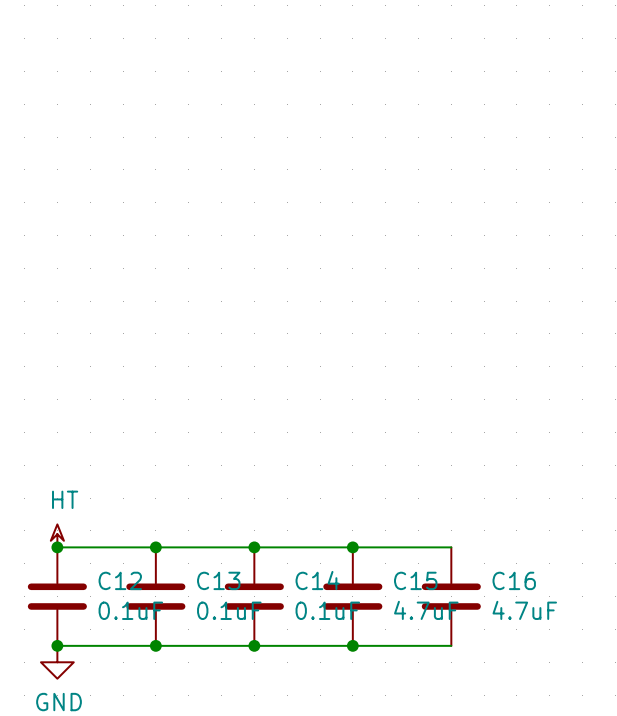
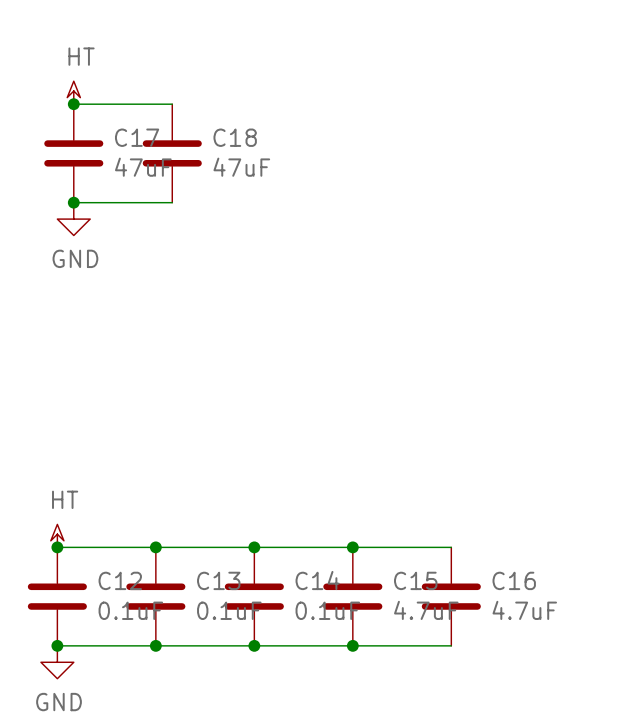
power symbol: none -> HT (73, 92)
wire: none -> (73, 104) (172, 104)
junction: none -> (73, 104)
C17: none -> 47uF (73, 153)
C18: none -> 47uF (172, 153)
wire: none -> (73, 202) (172, 202)
junction: none -> (73, 202)
power symbol: none -> GND (73, 219)

